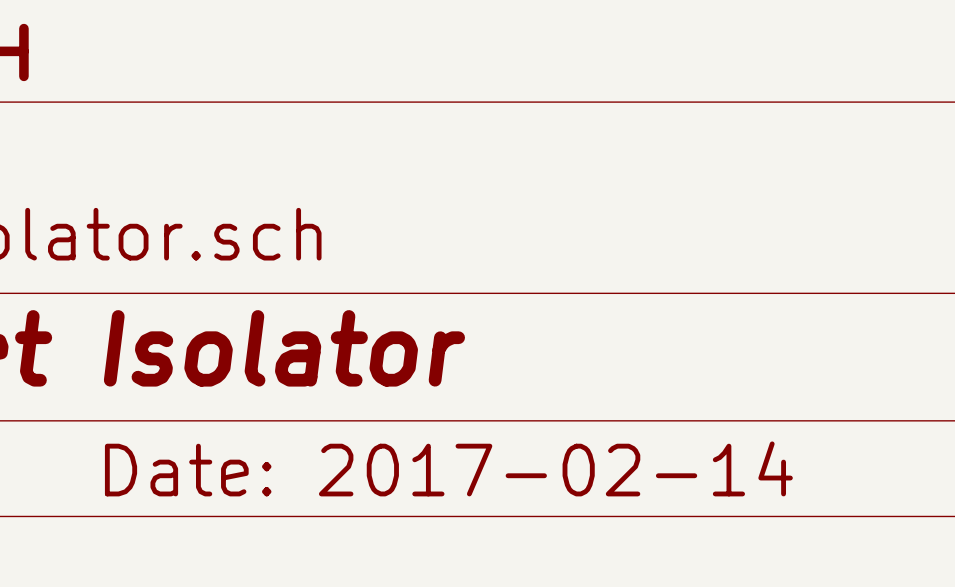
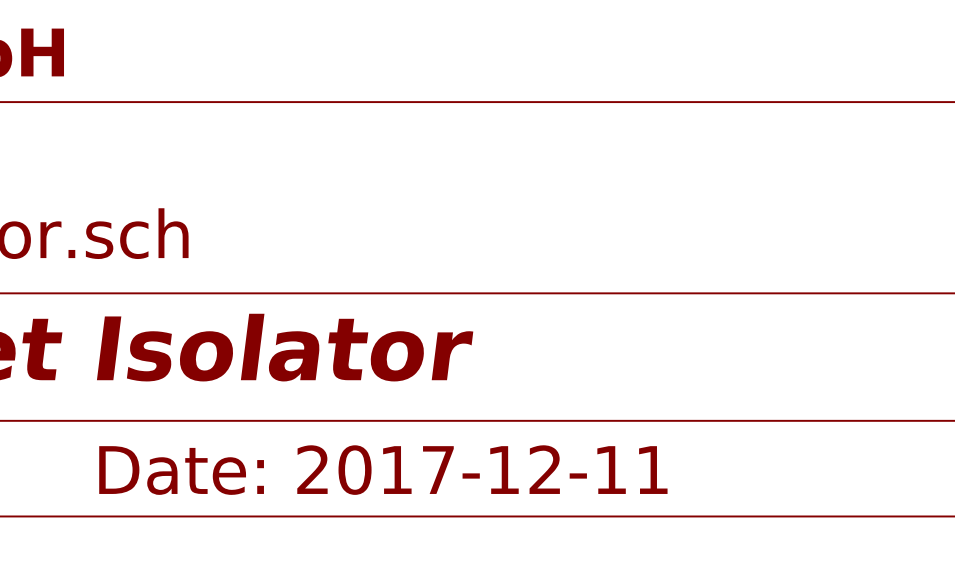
title block: Date: 2017-02-14 (448, 468) -> Date: 2017-12-11 (383, 470)

